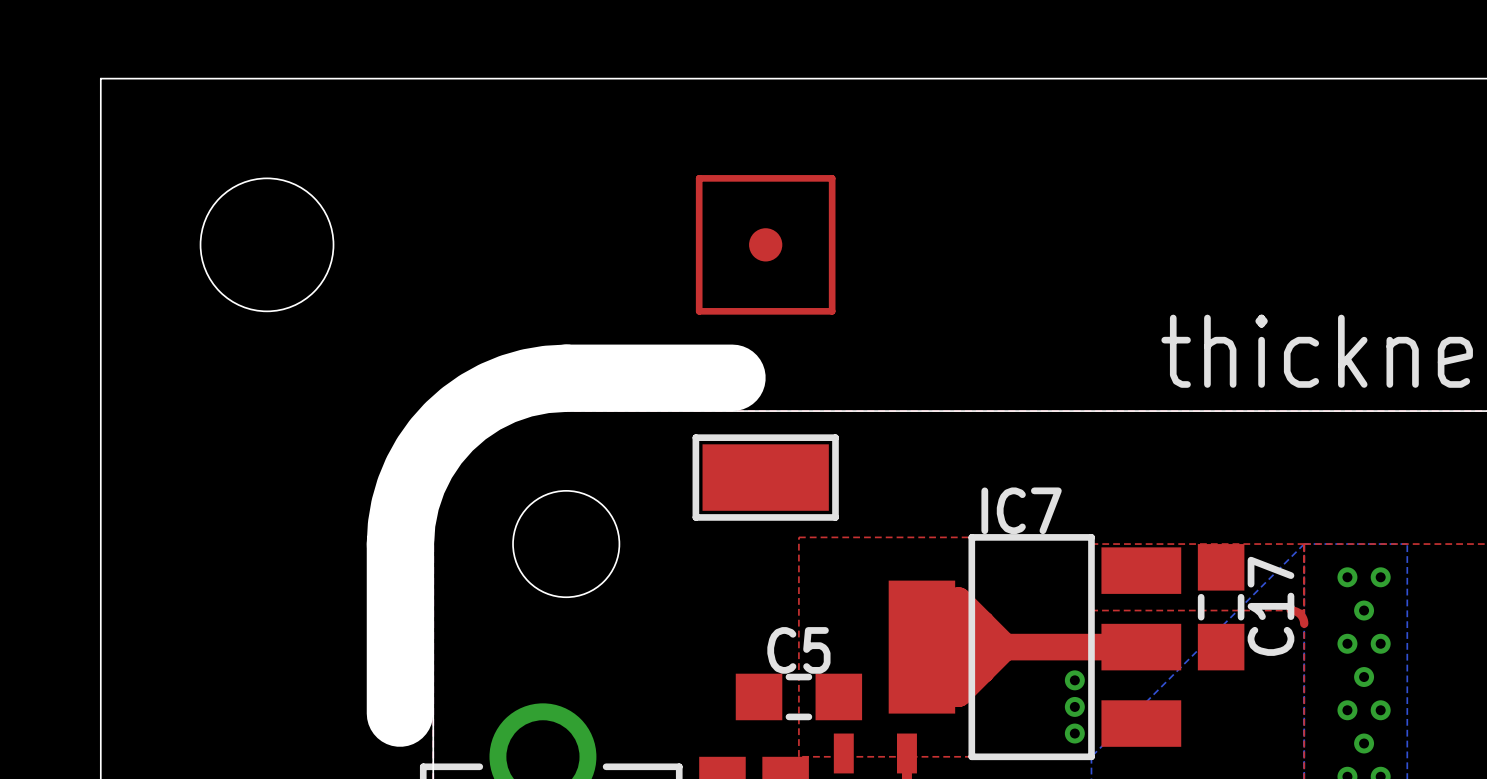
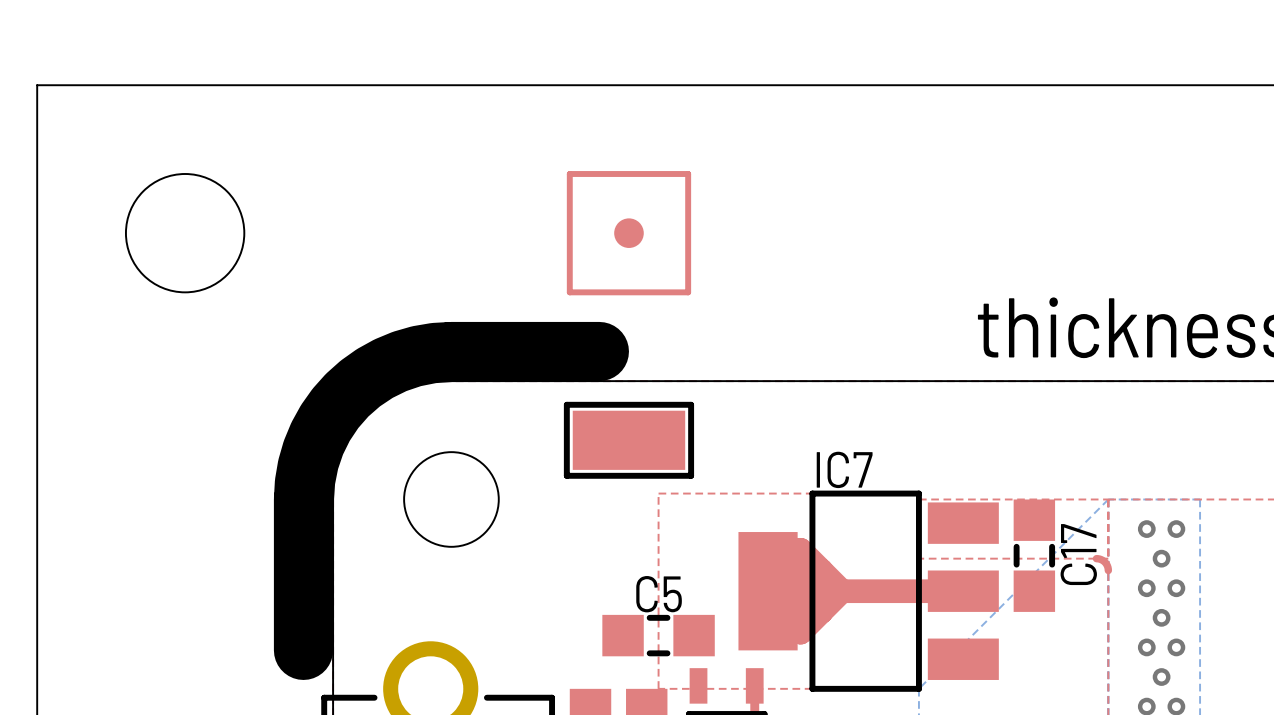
via: (1074, 680) -> none
via: (1074, 706) -> none
via: (1074, 733) -> none

